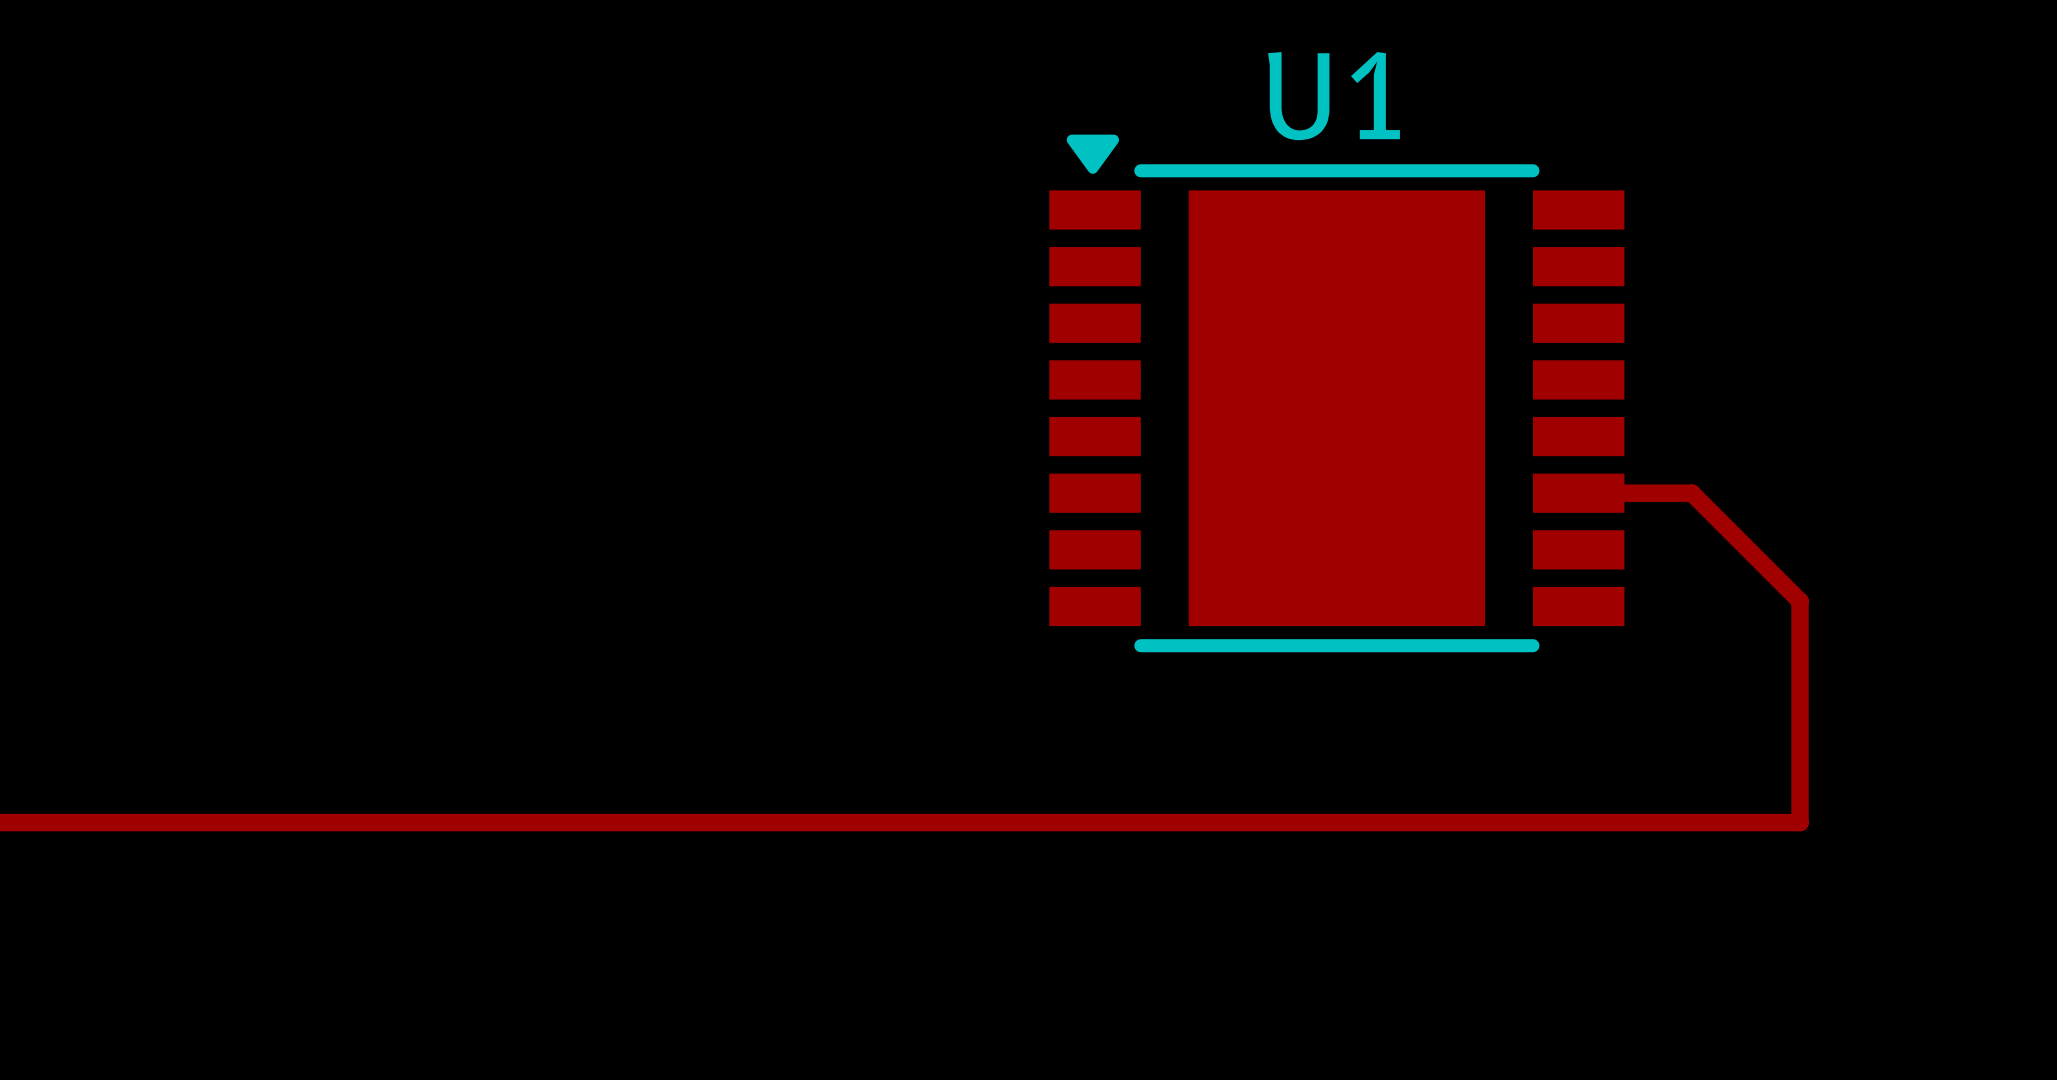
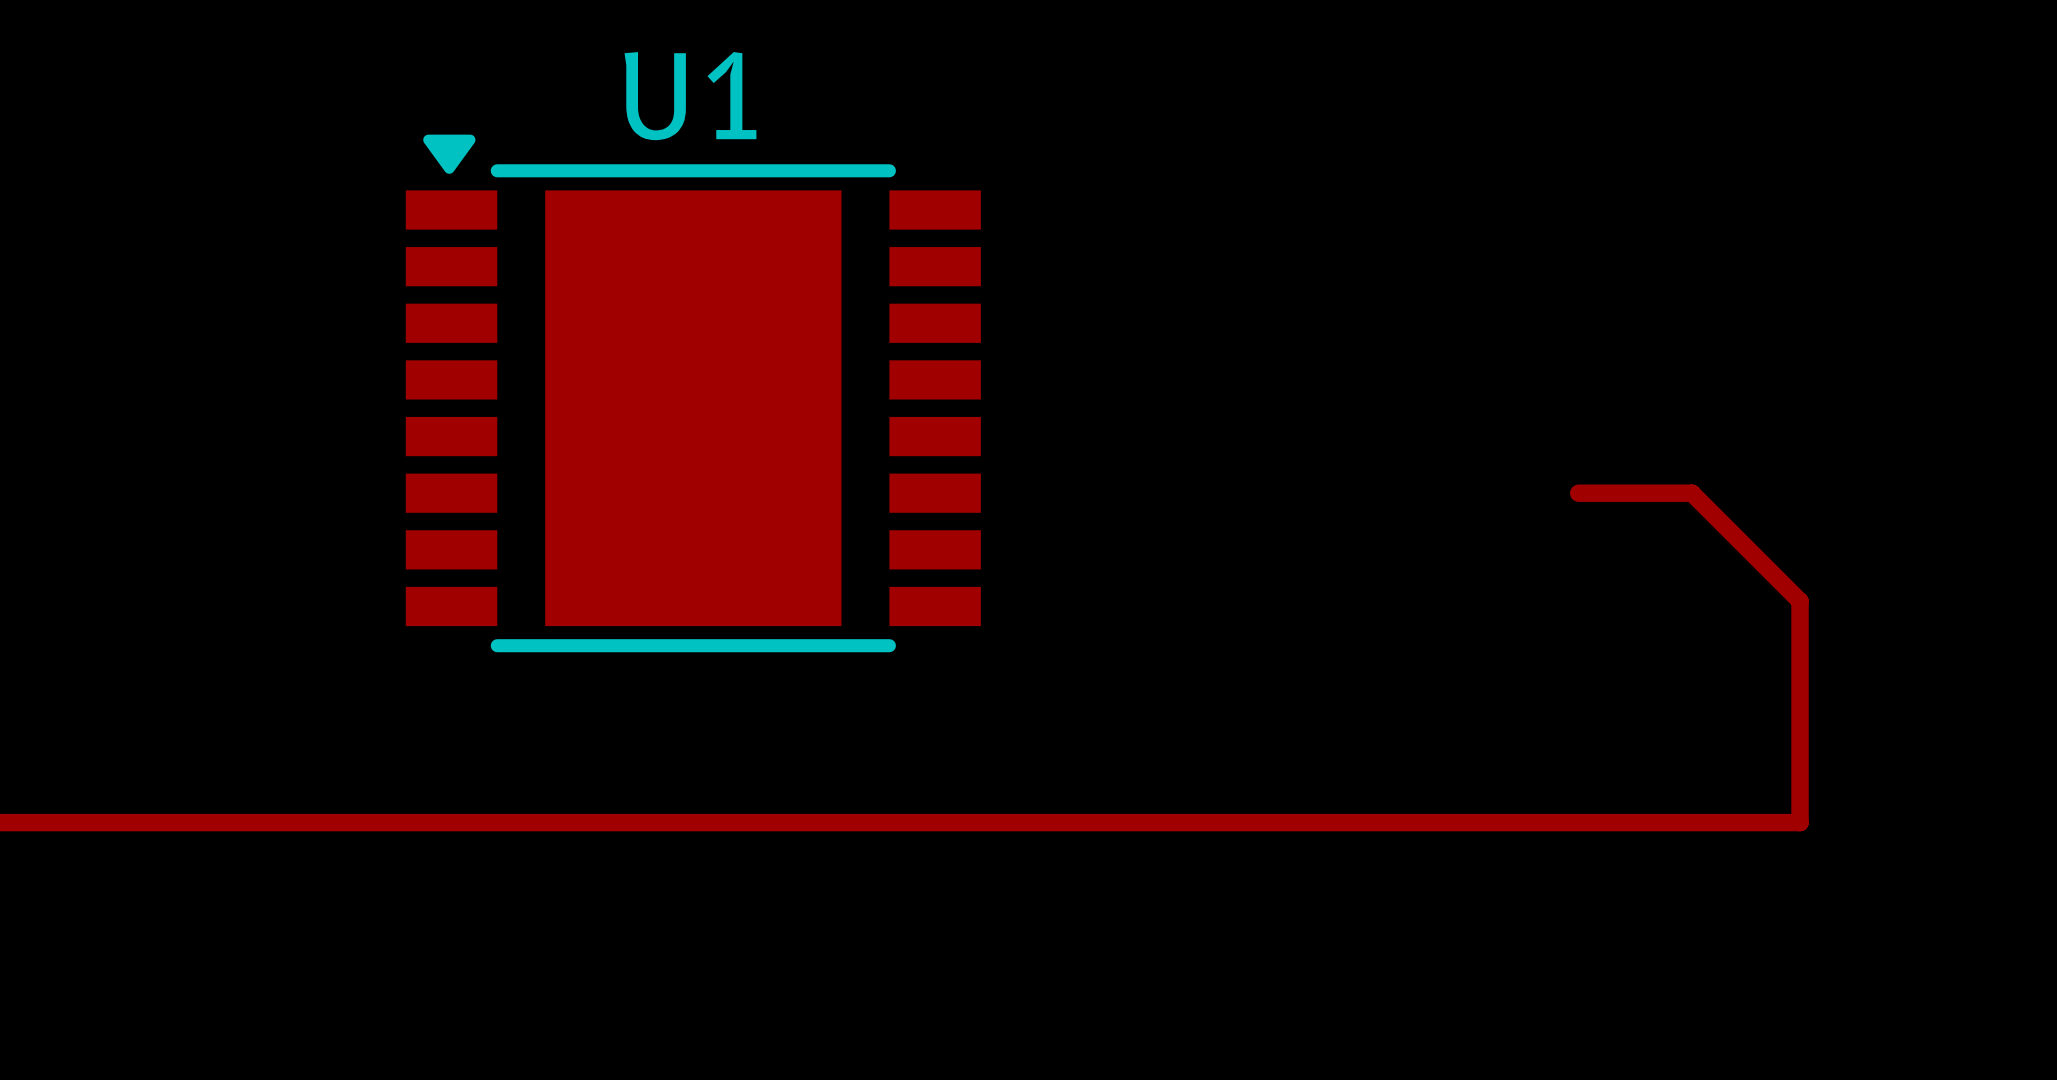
U1 position: (1336, 393) -> (693, 393)

